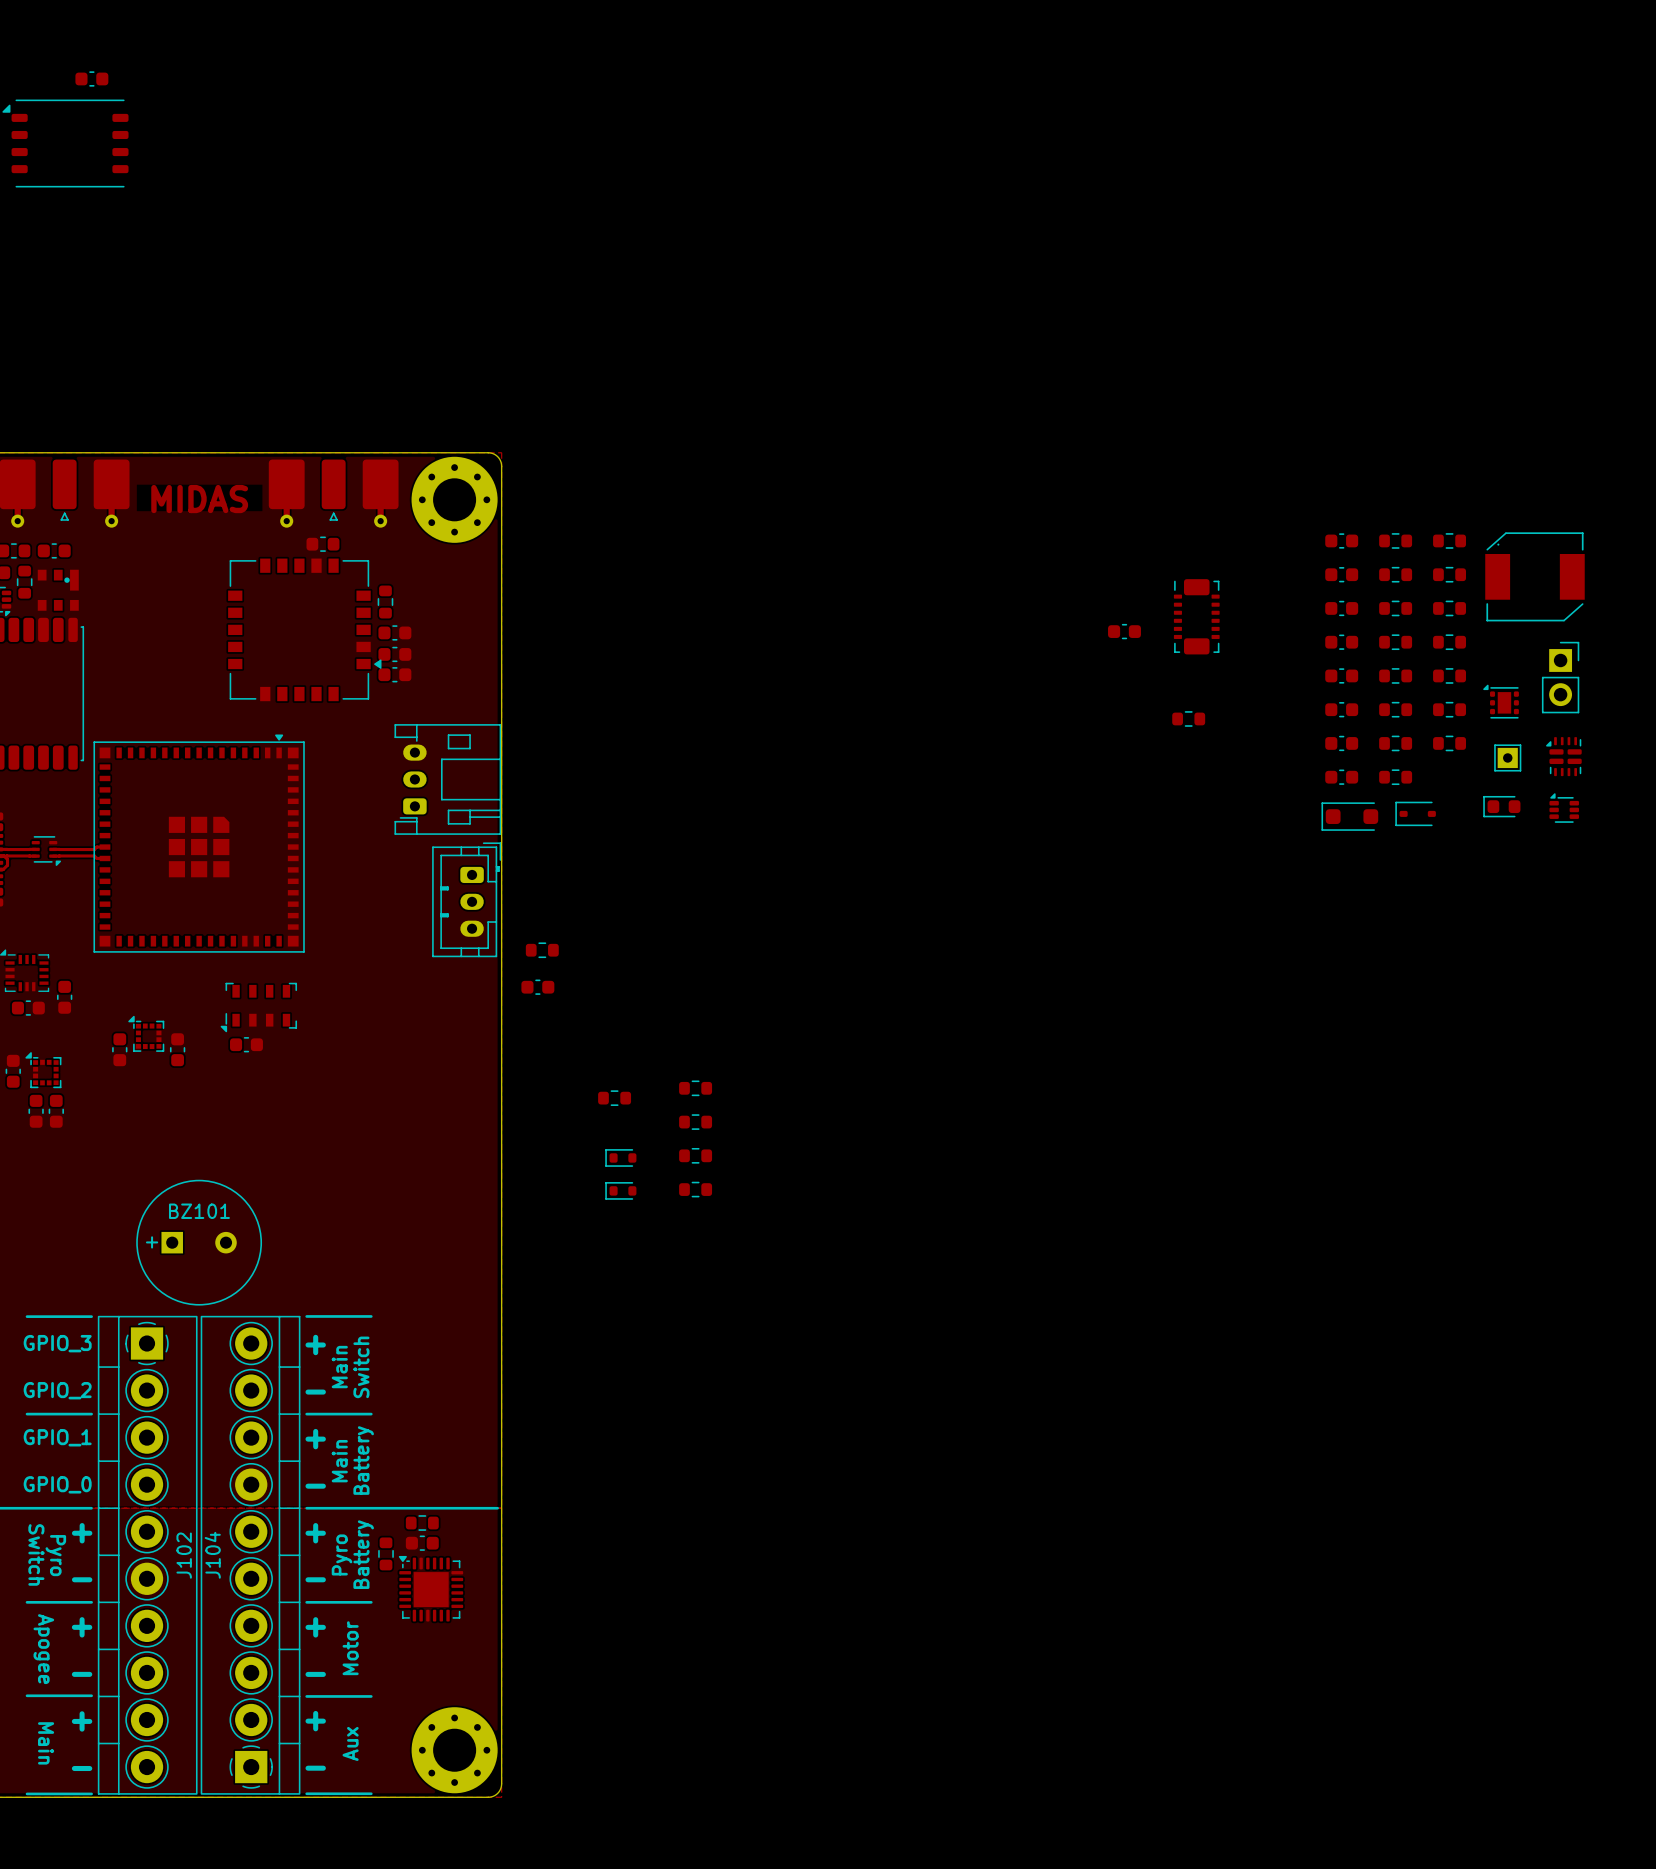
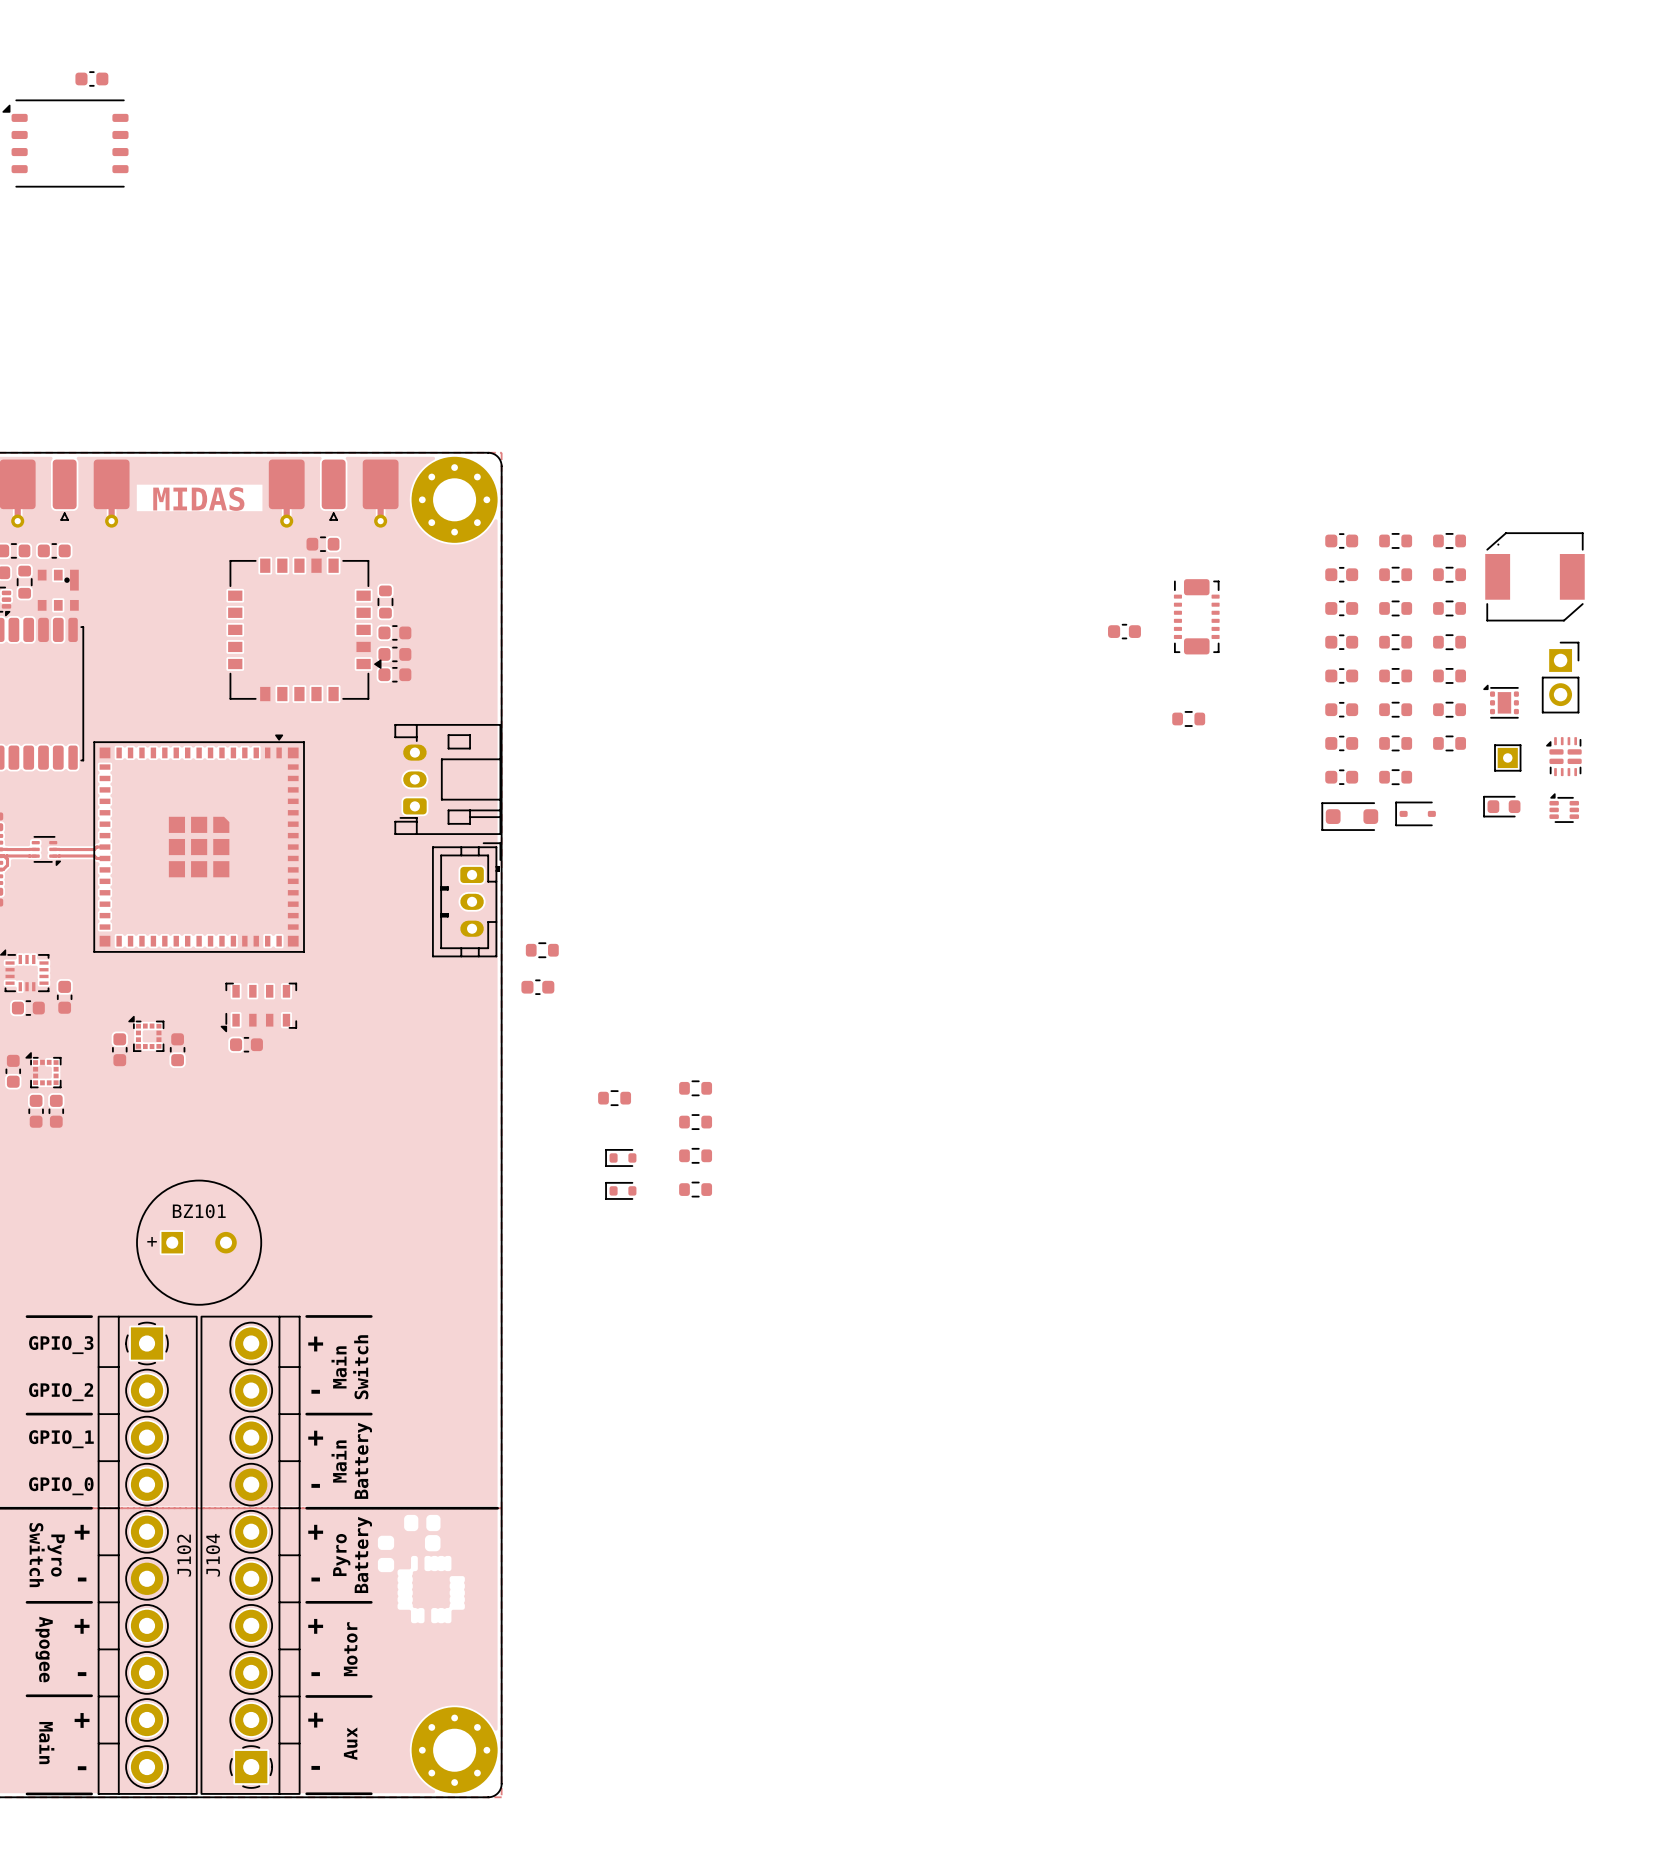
part: (422, 1523) -> none
part: (422, 1543) -> none
part: (386, 1553) -> none
part: (430, 1588) -> none

